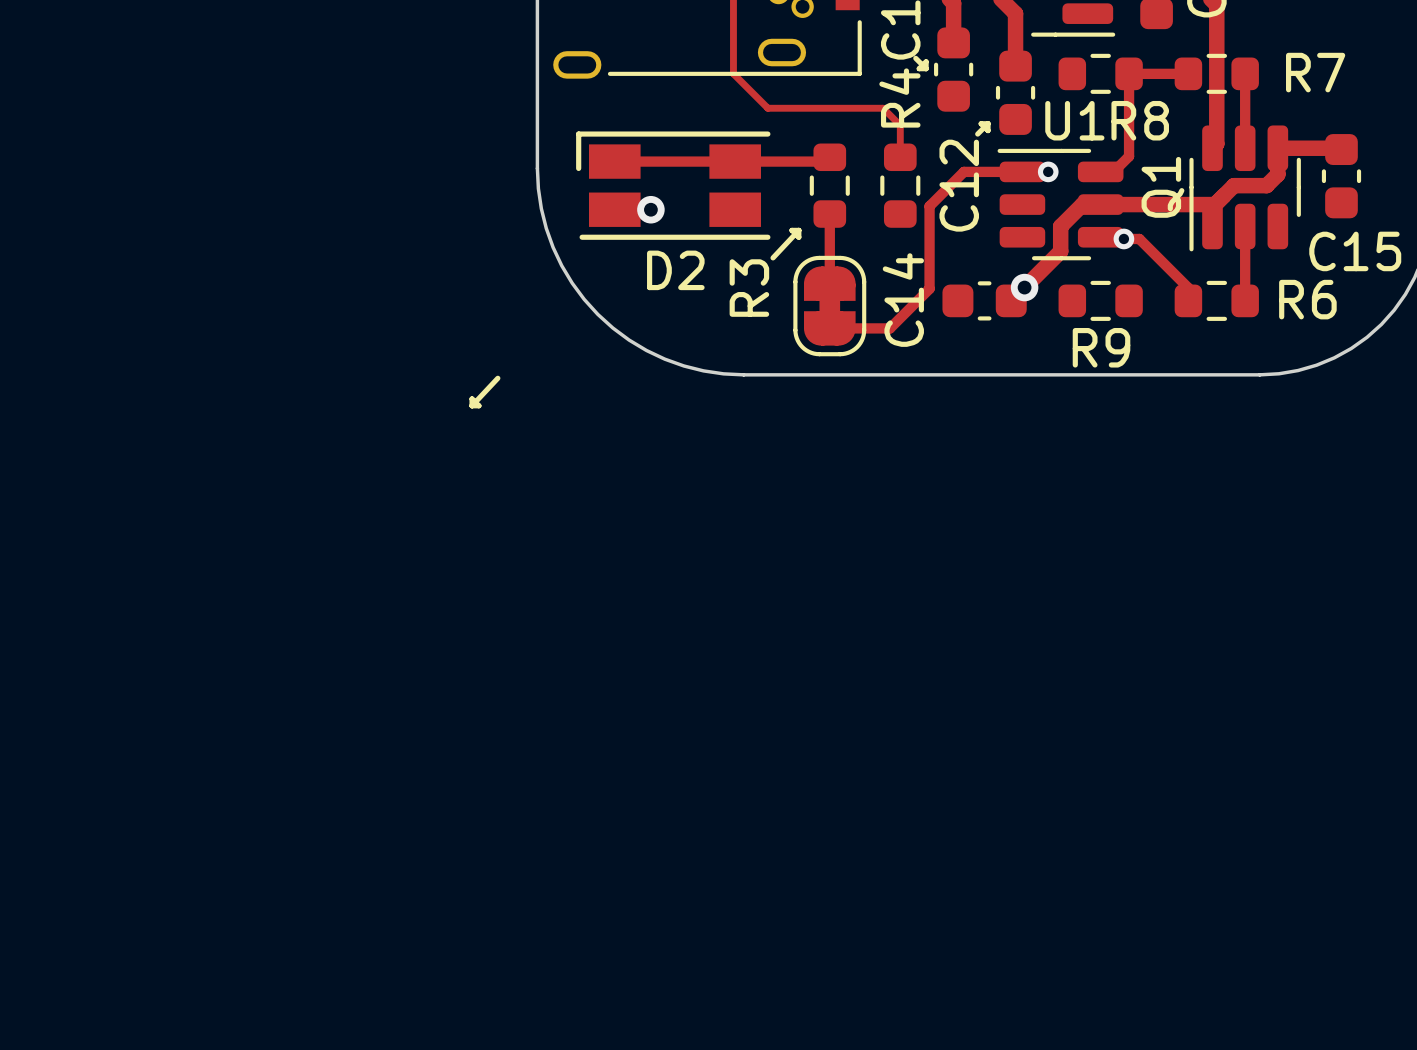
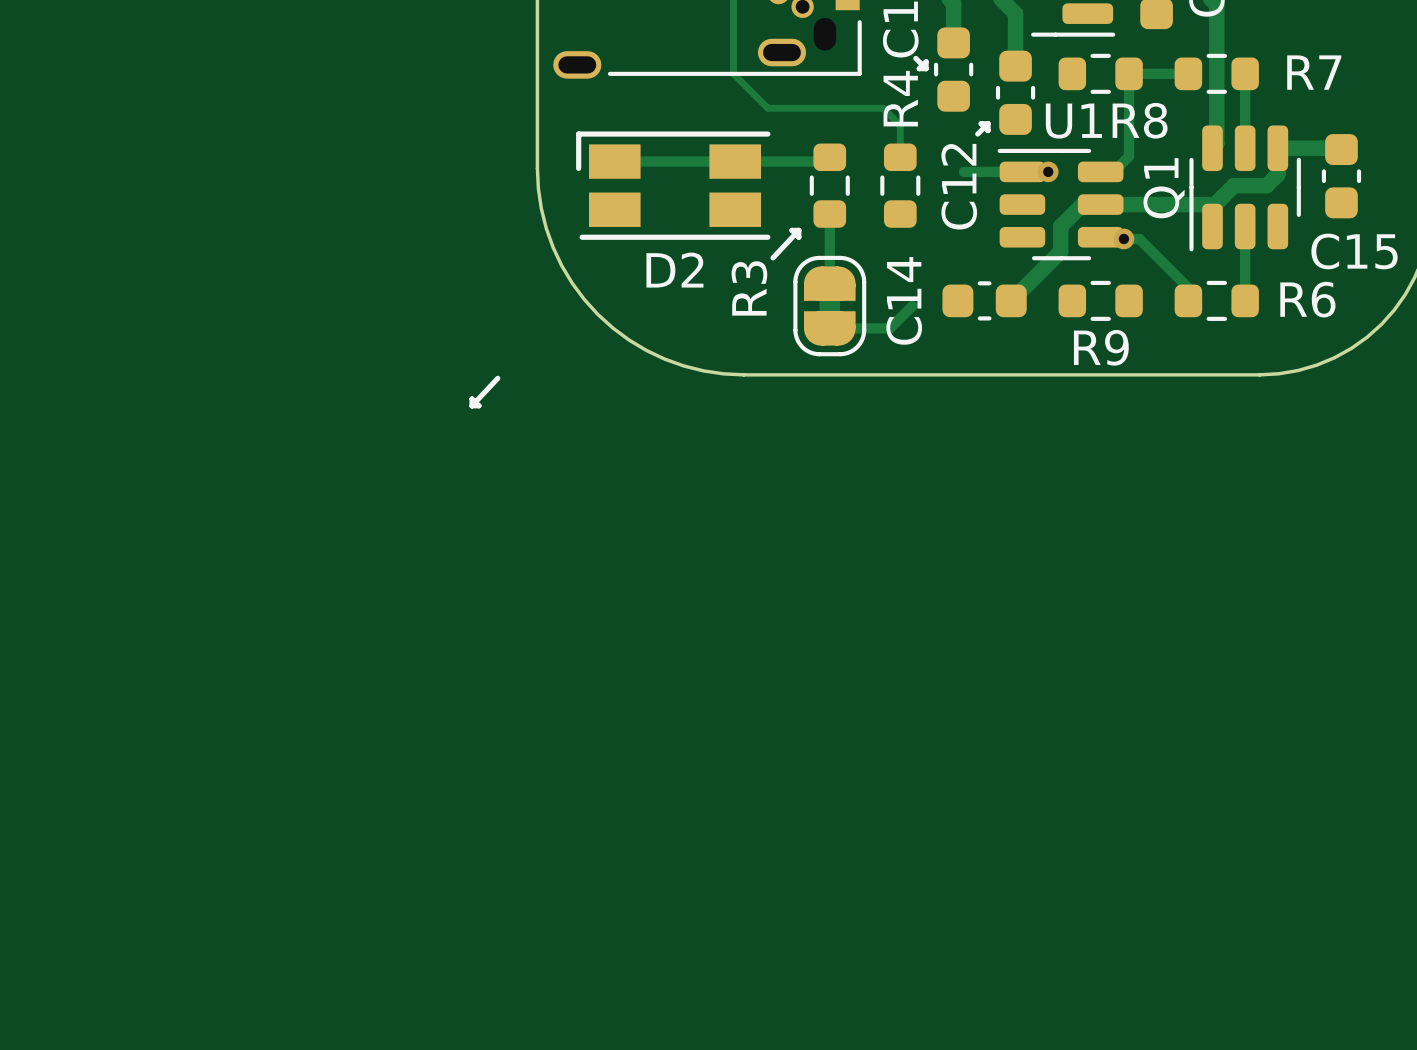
track: (963, 171) (929, 206) (929, 288) (912, 306) -> none
via: (650, 209) -> none
via: (1024, 287) -> none

